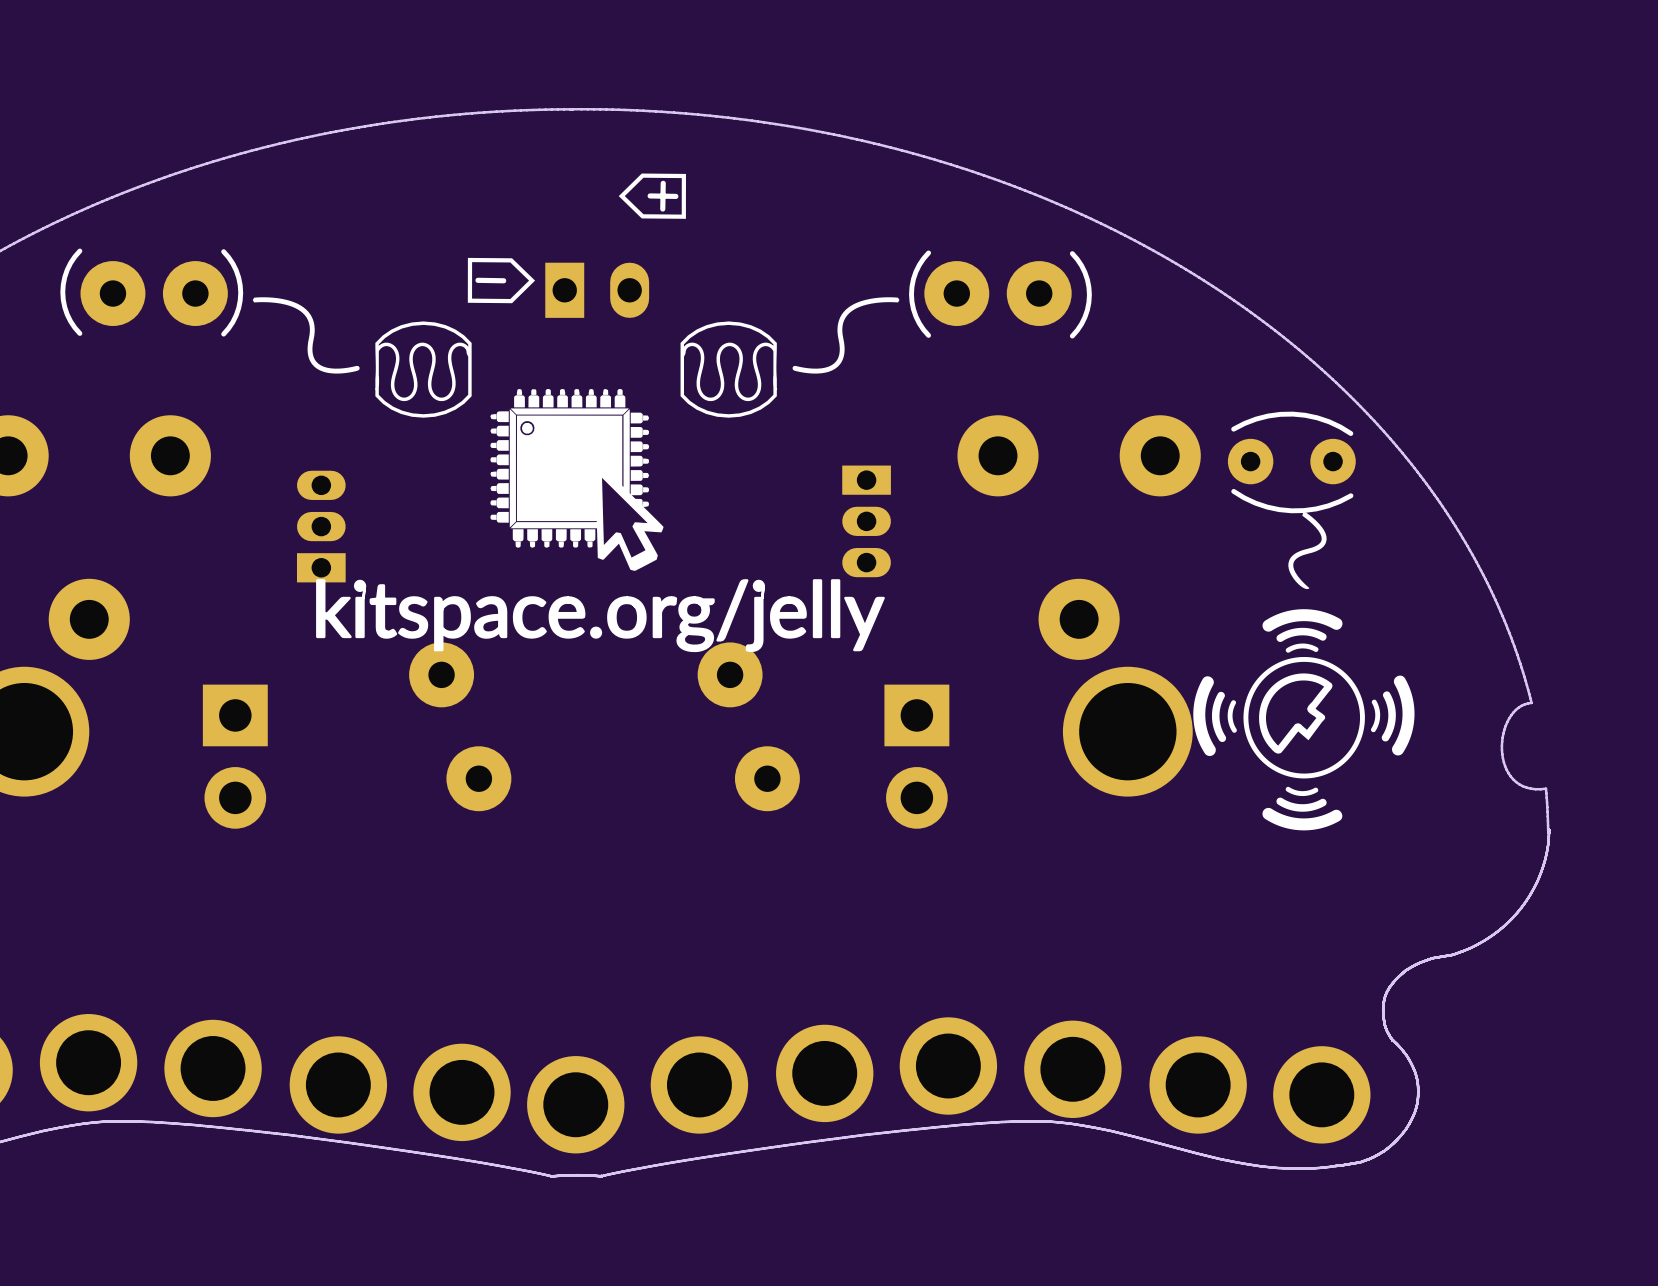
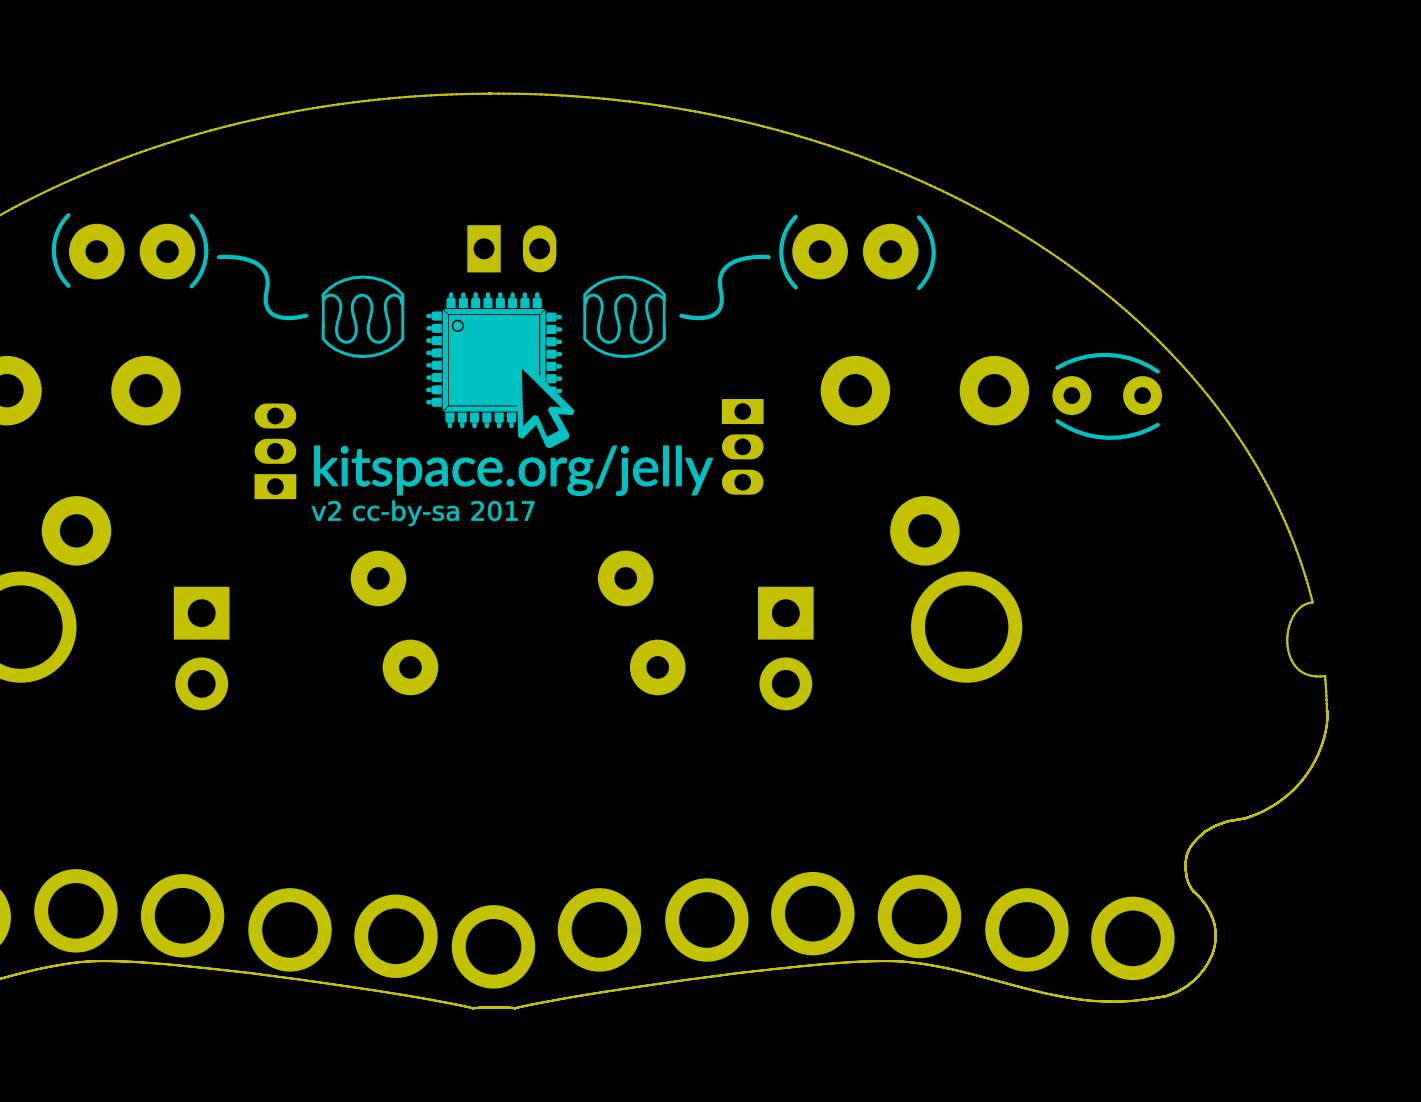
drawing: [618, 173, 686, 219] -> none
drawing: [467, 257, 536, 304] -> none
drawing position: (576, 479) -> (500, 370)
drawing: [1193, 511, 1415, 831] -> none
drawing: none -> [311, 445, 714, 527]
drawing: [316, 579, 885, 653] -> none

